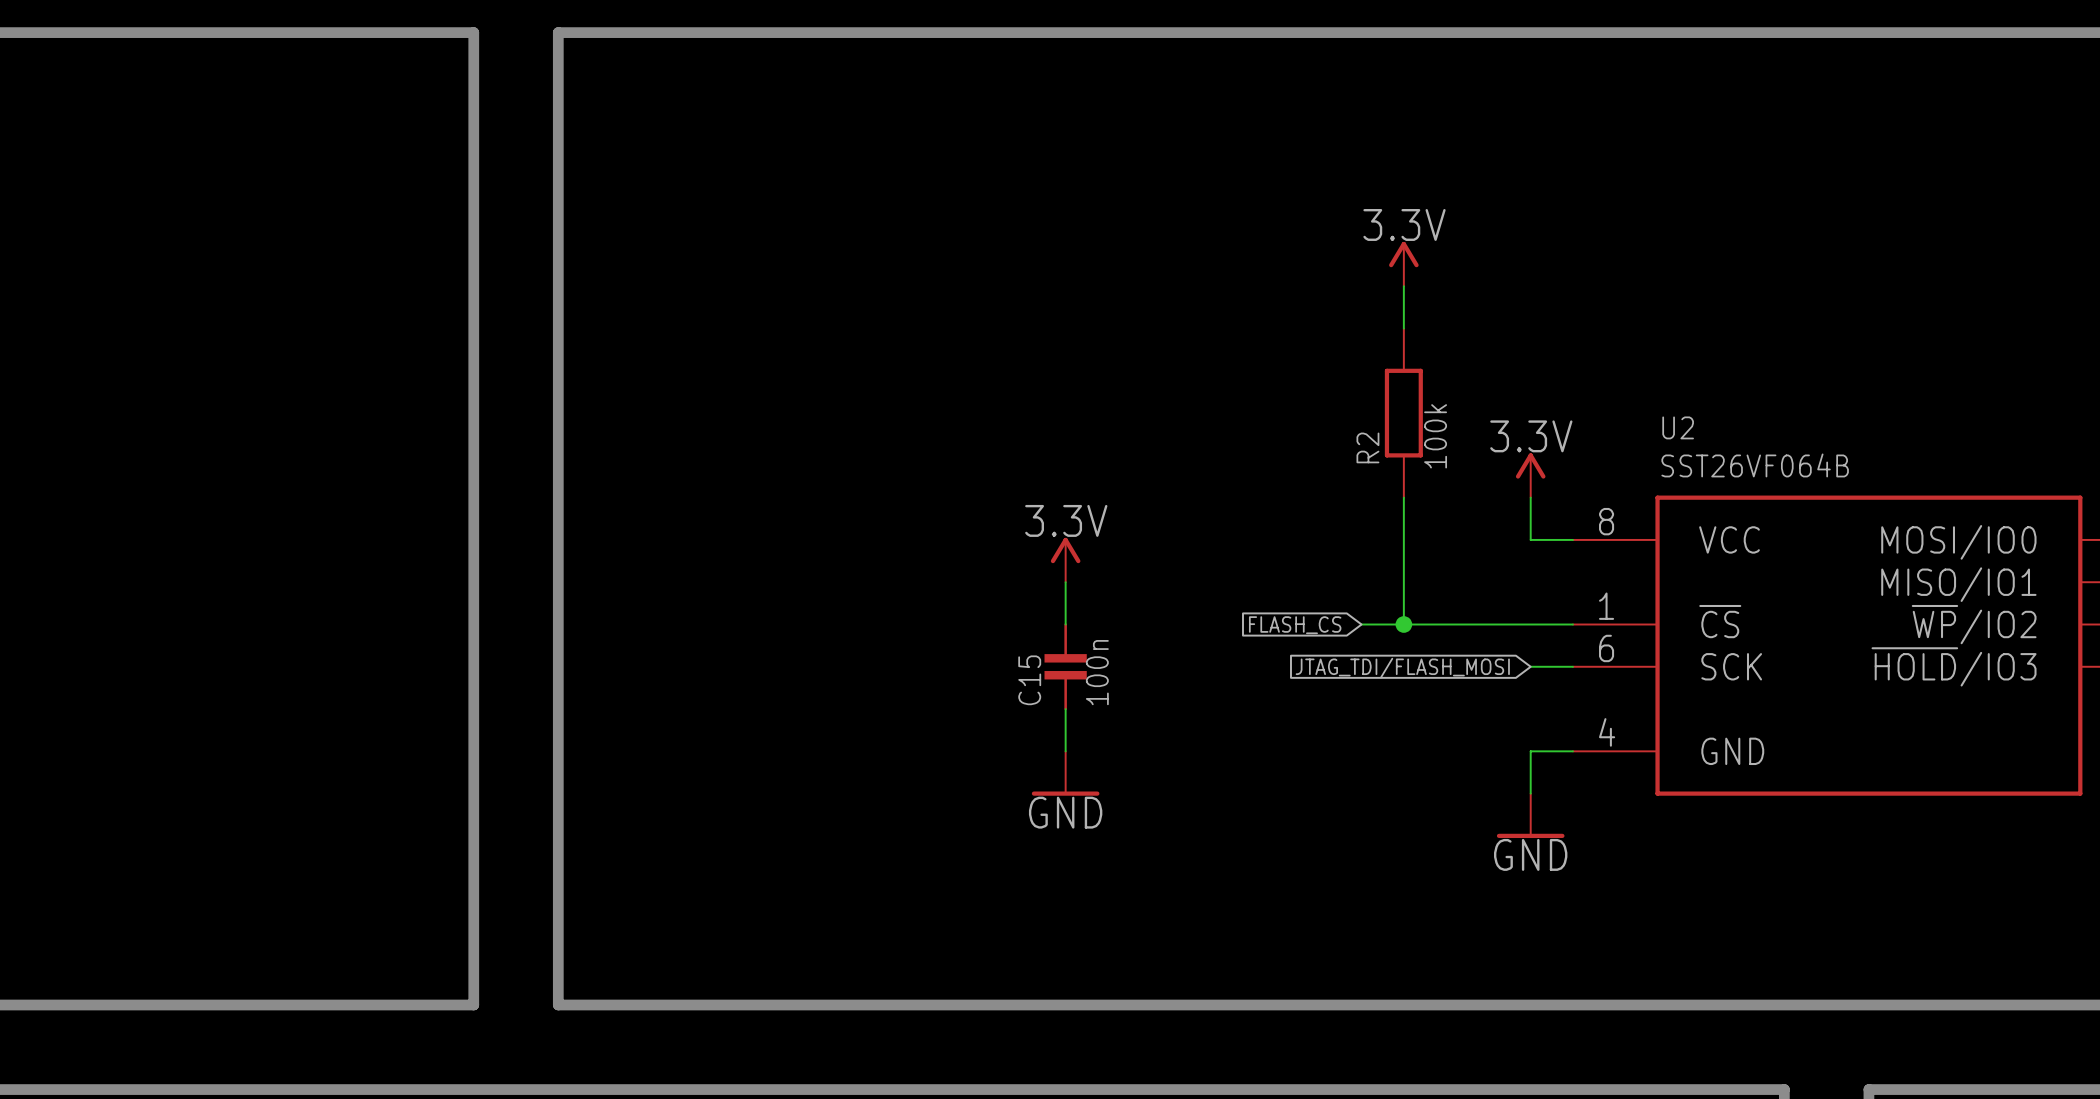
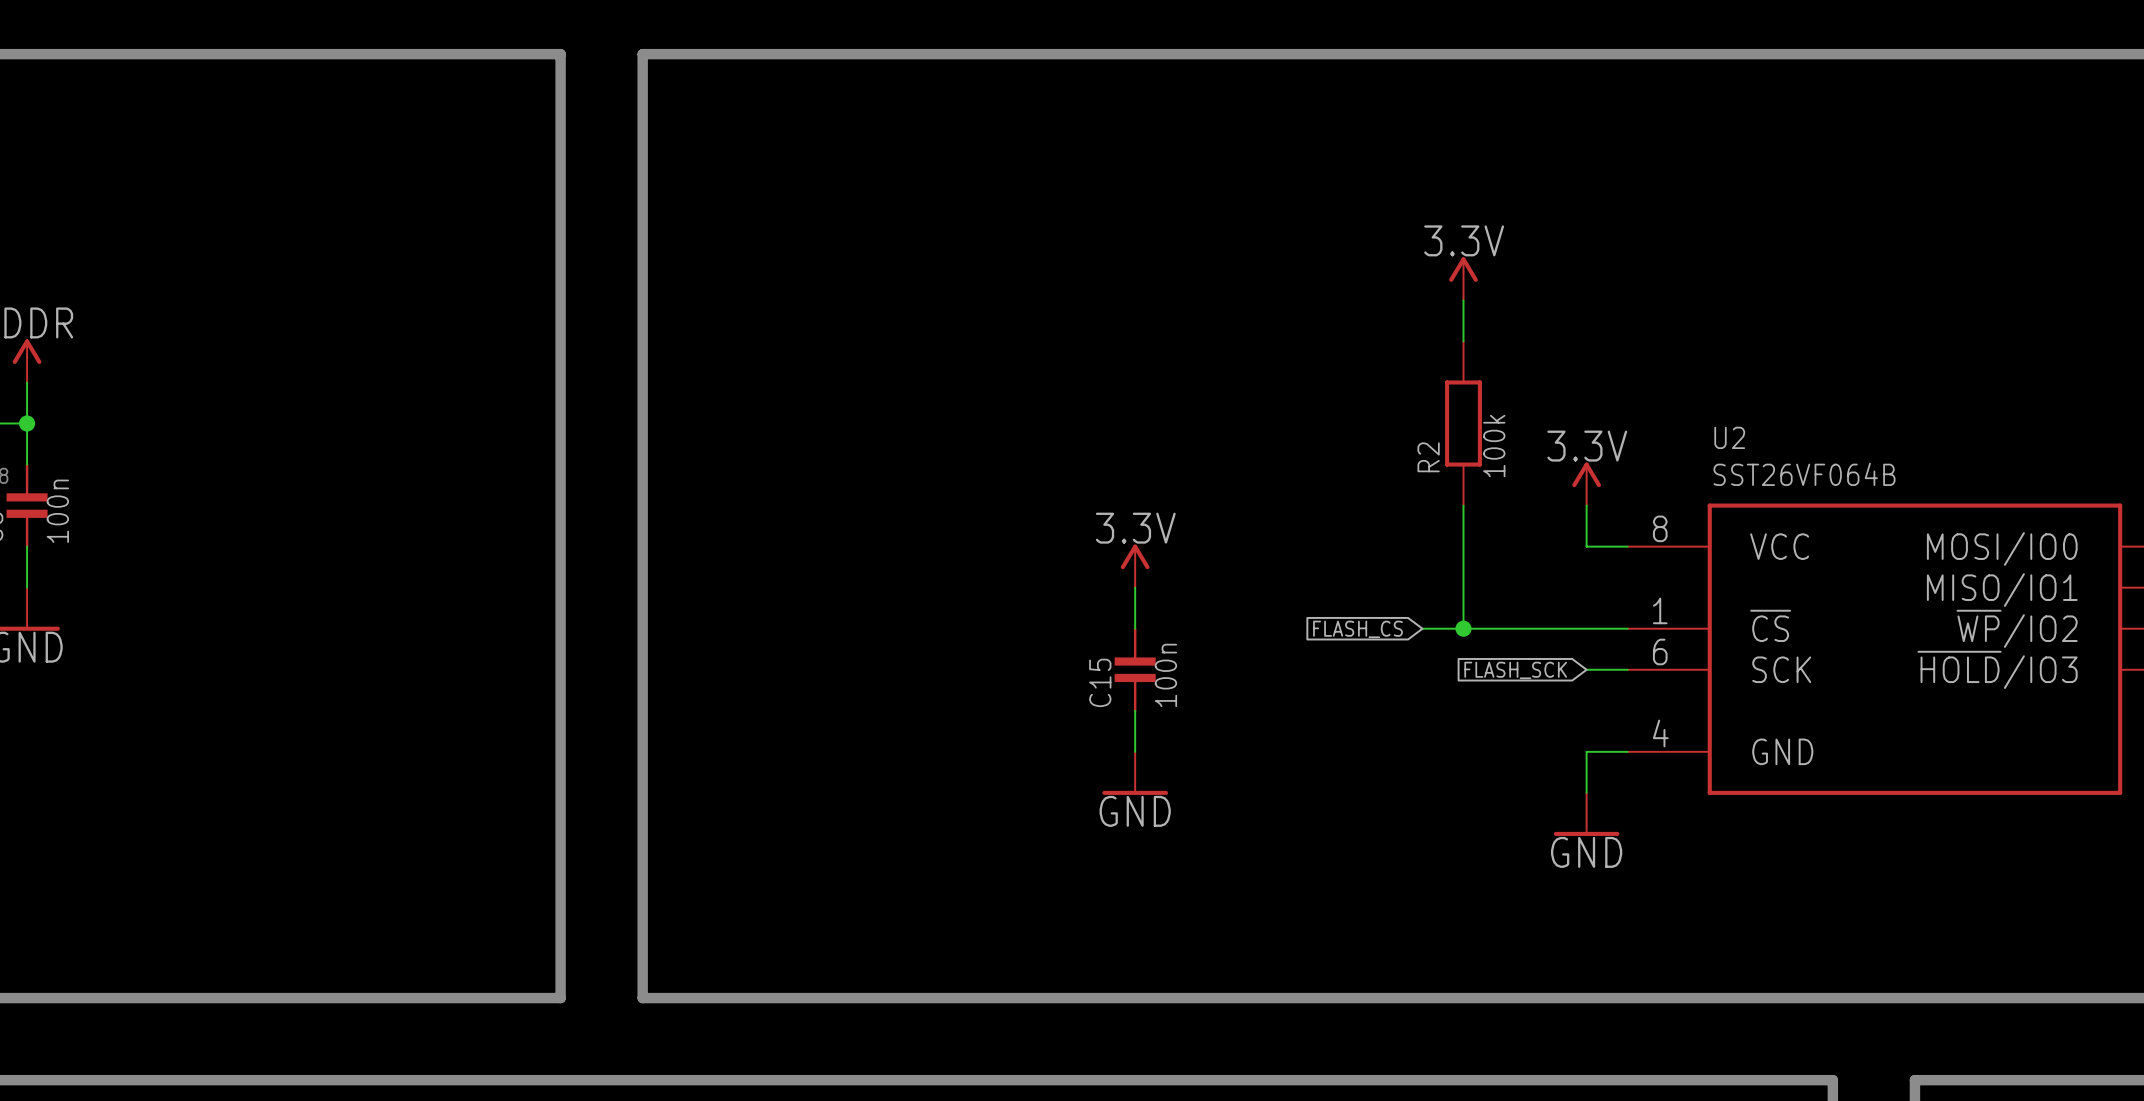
global label: JTAG_TDI/FLASH_MOSI (1402, 668) -> FLASH_SCK (1515, 670)

